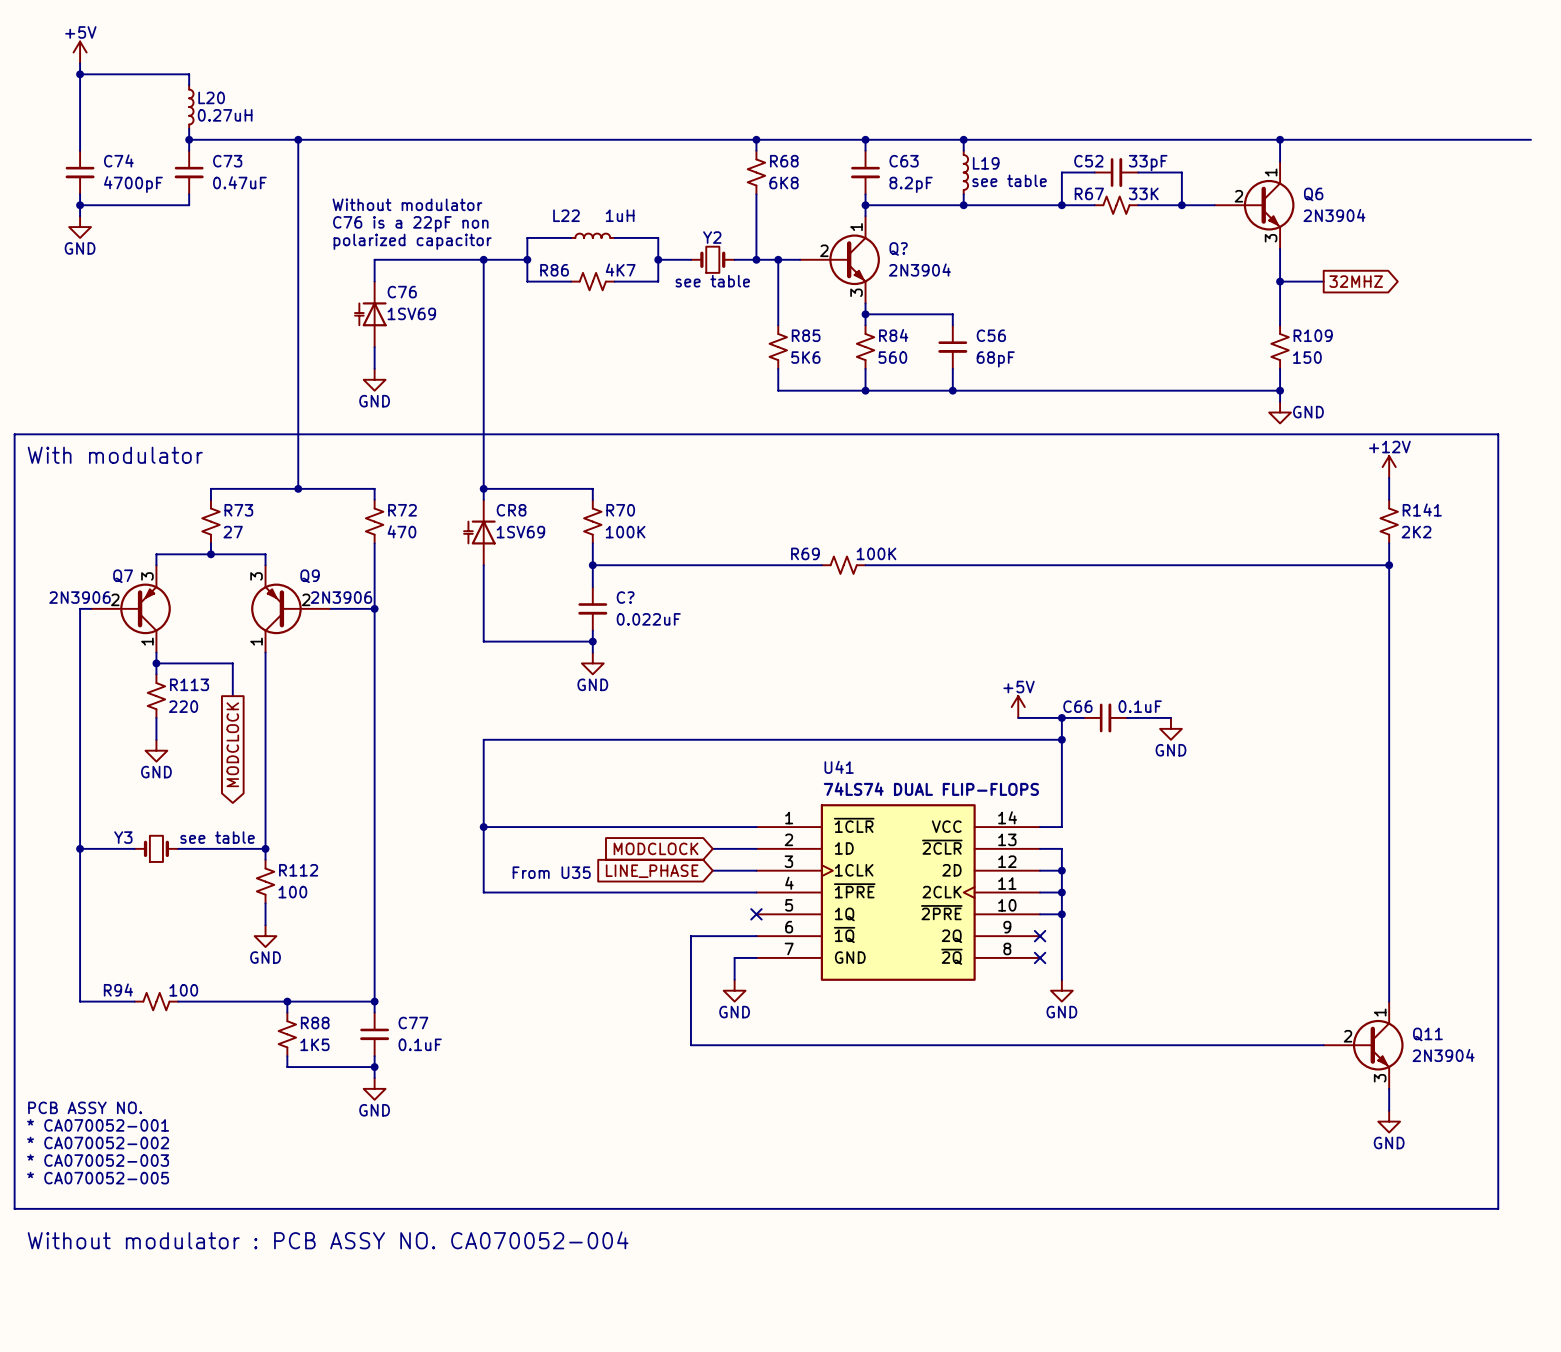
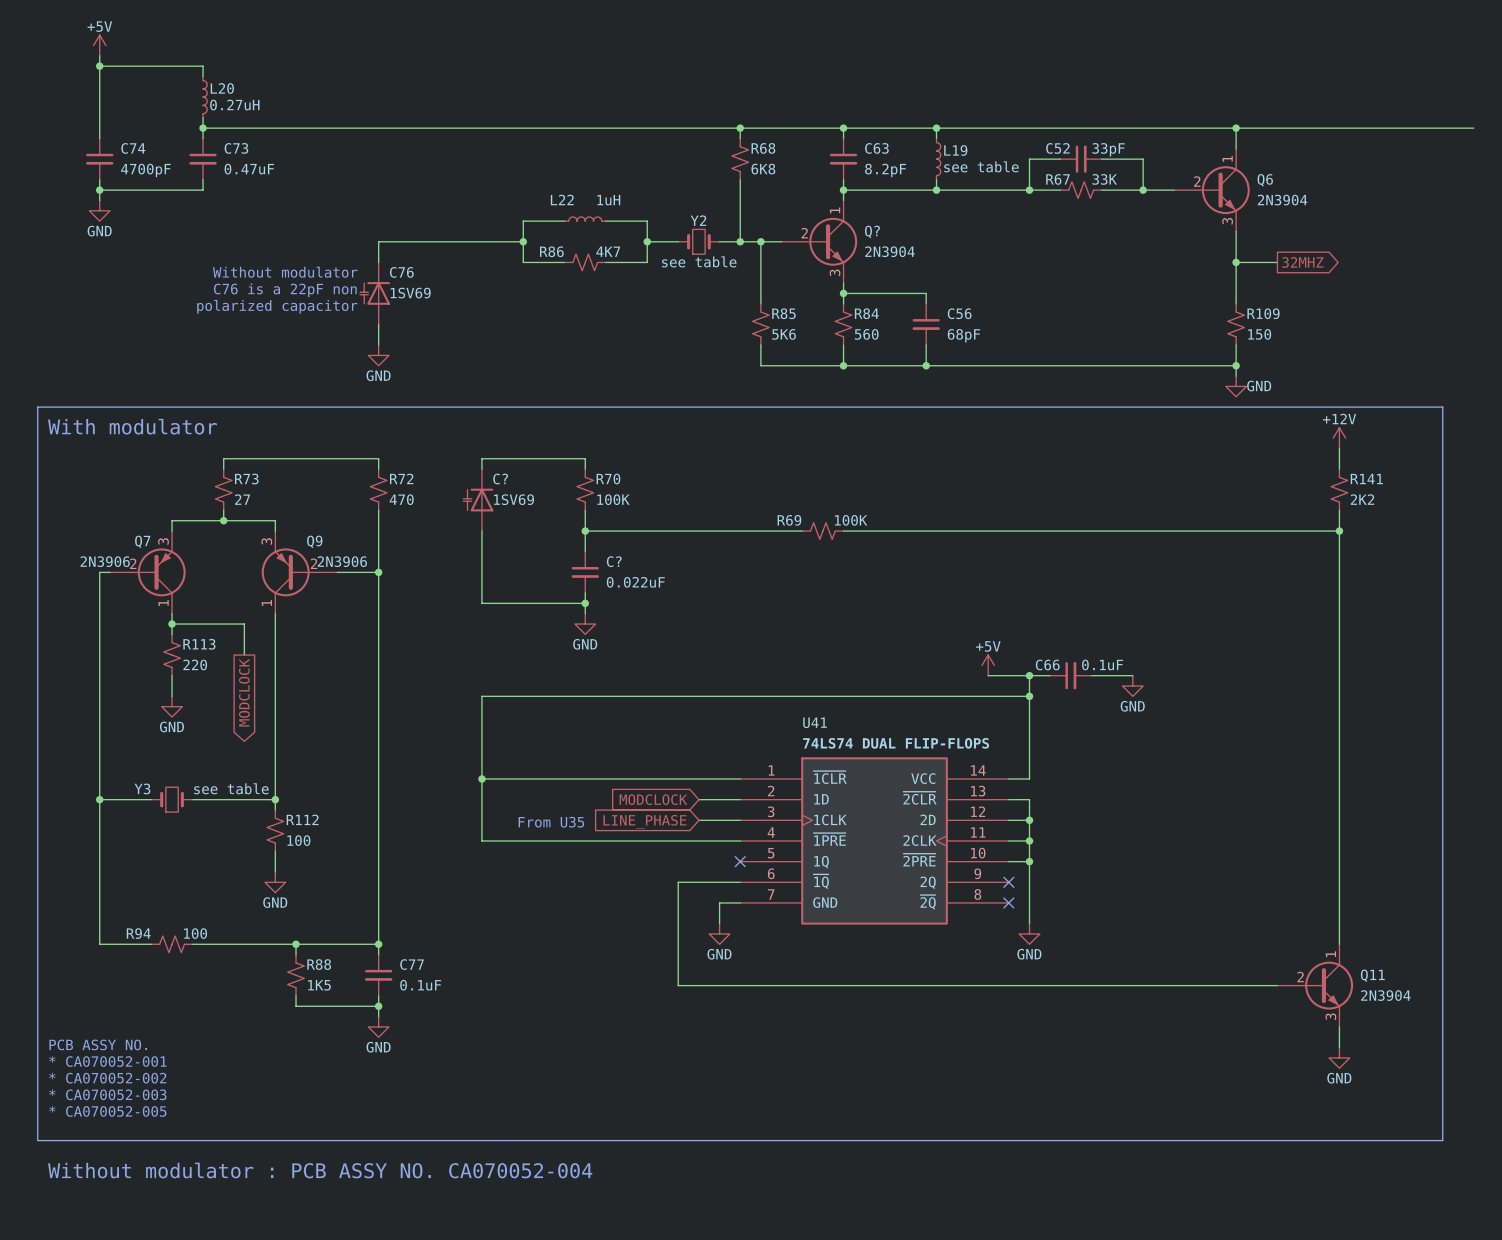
wire: (298, 139) (298, 488) -> none
junction: (298, 139) -> none
text position: Without modulator (407, 204) -> Without modulator (285, 272)
text position: C76 is a 22pF non (410, 224) -> C76 is a 22pF non (285, 290)
text position: polarized capacitor (412, 241) -> polarized capacitor (277, 306)
wire: (483, 259) (483, 488) -> none
junction: (483, 259) -> none
junction: (298, 488) -> none
junction: (483, 488) -> none
CR8 name: CR8 (511, 510) -> C? (500, 479)

